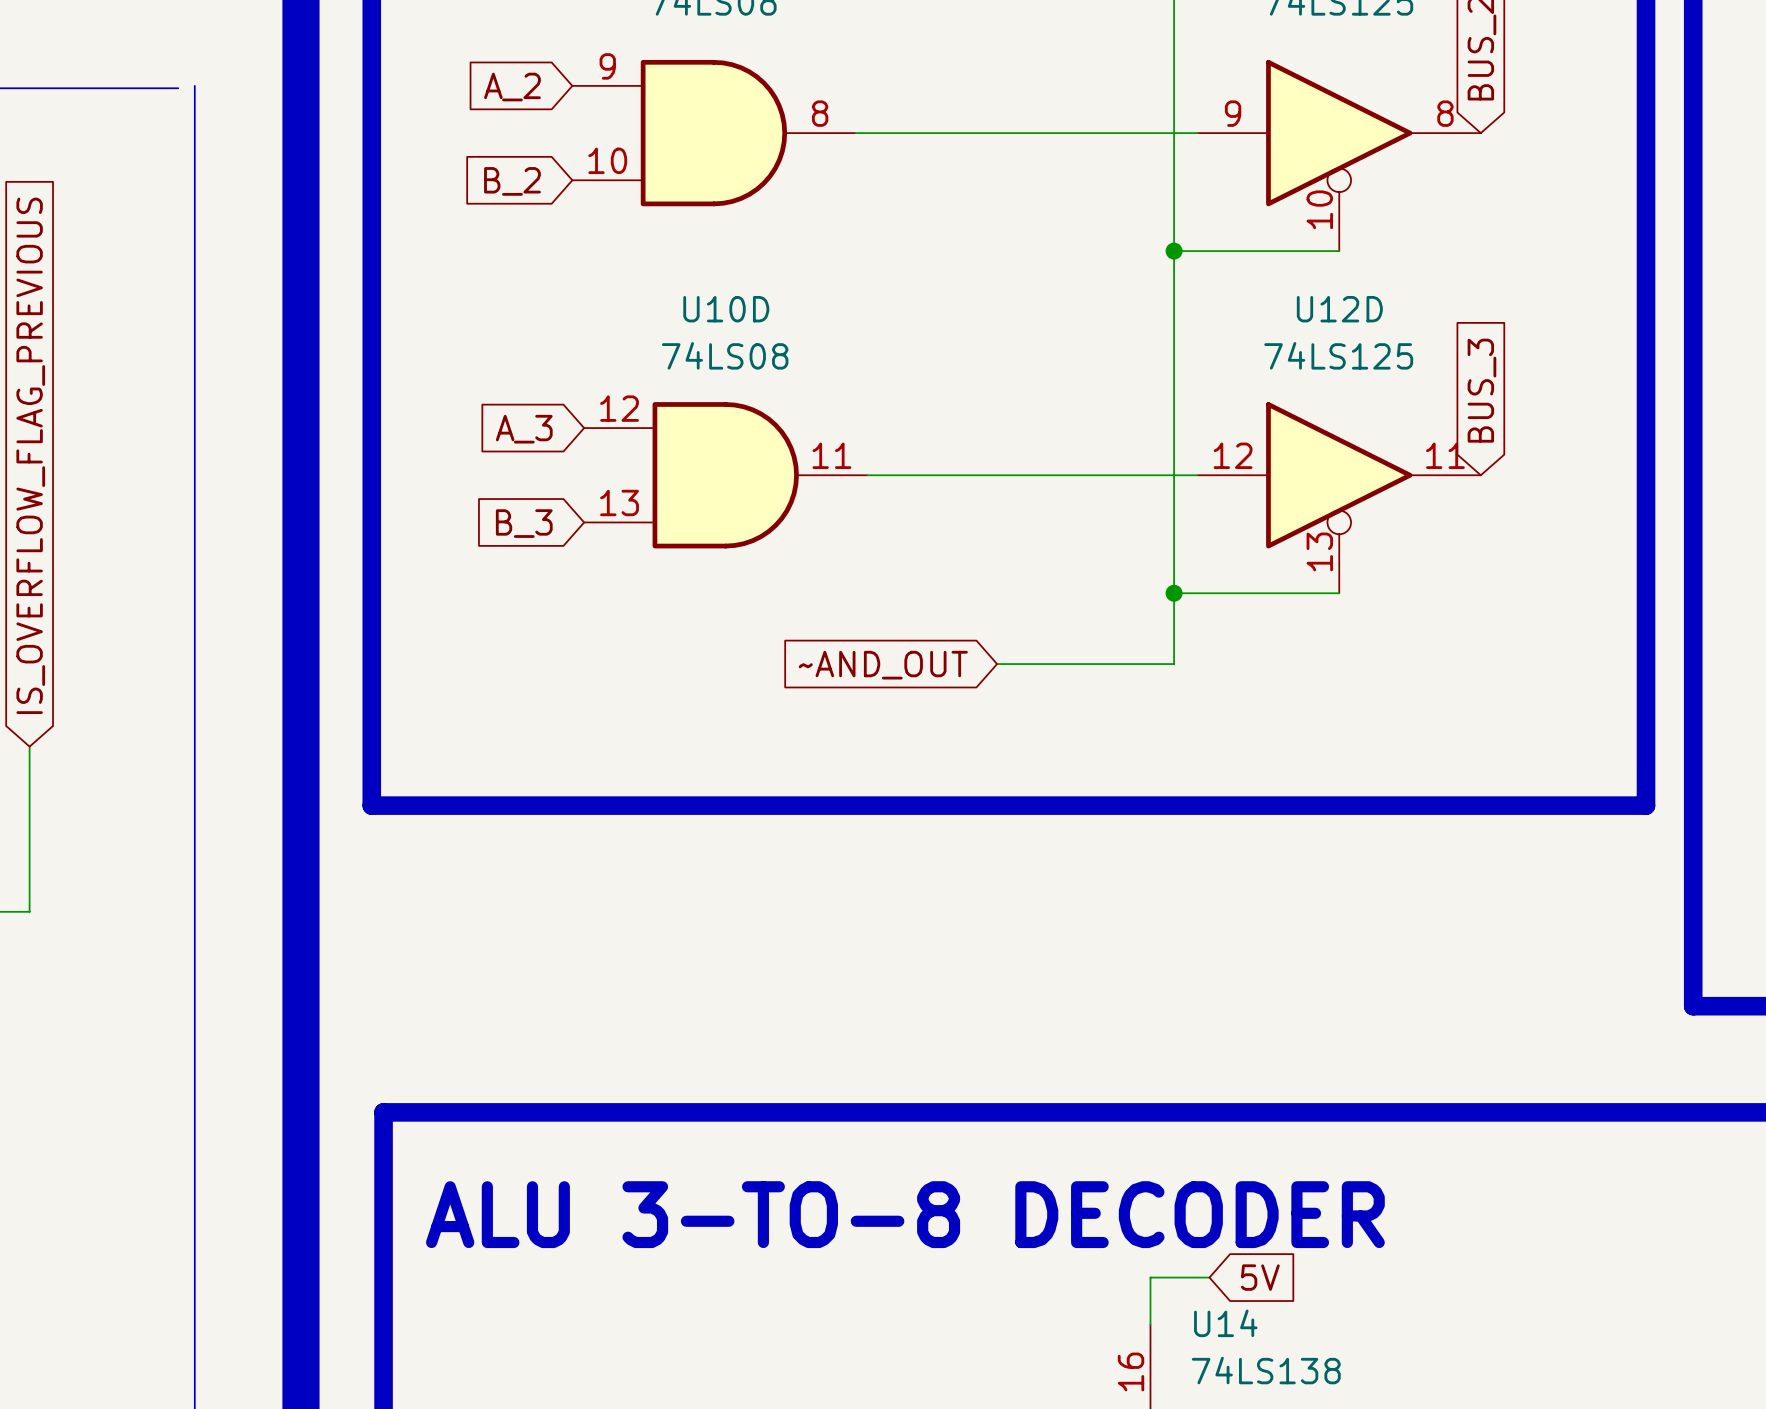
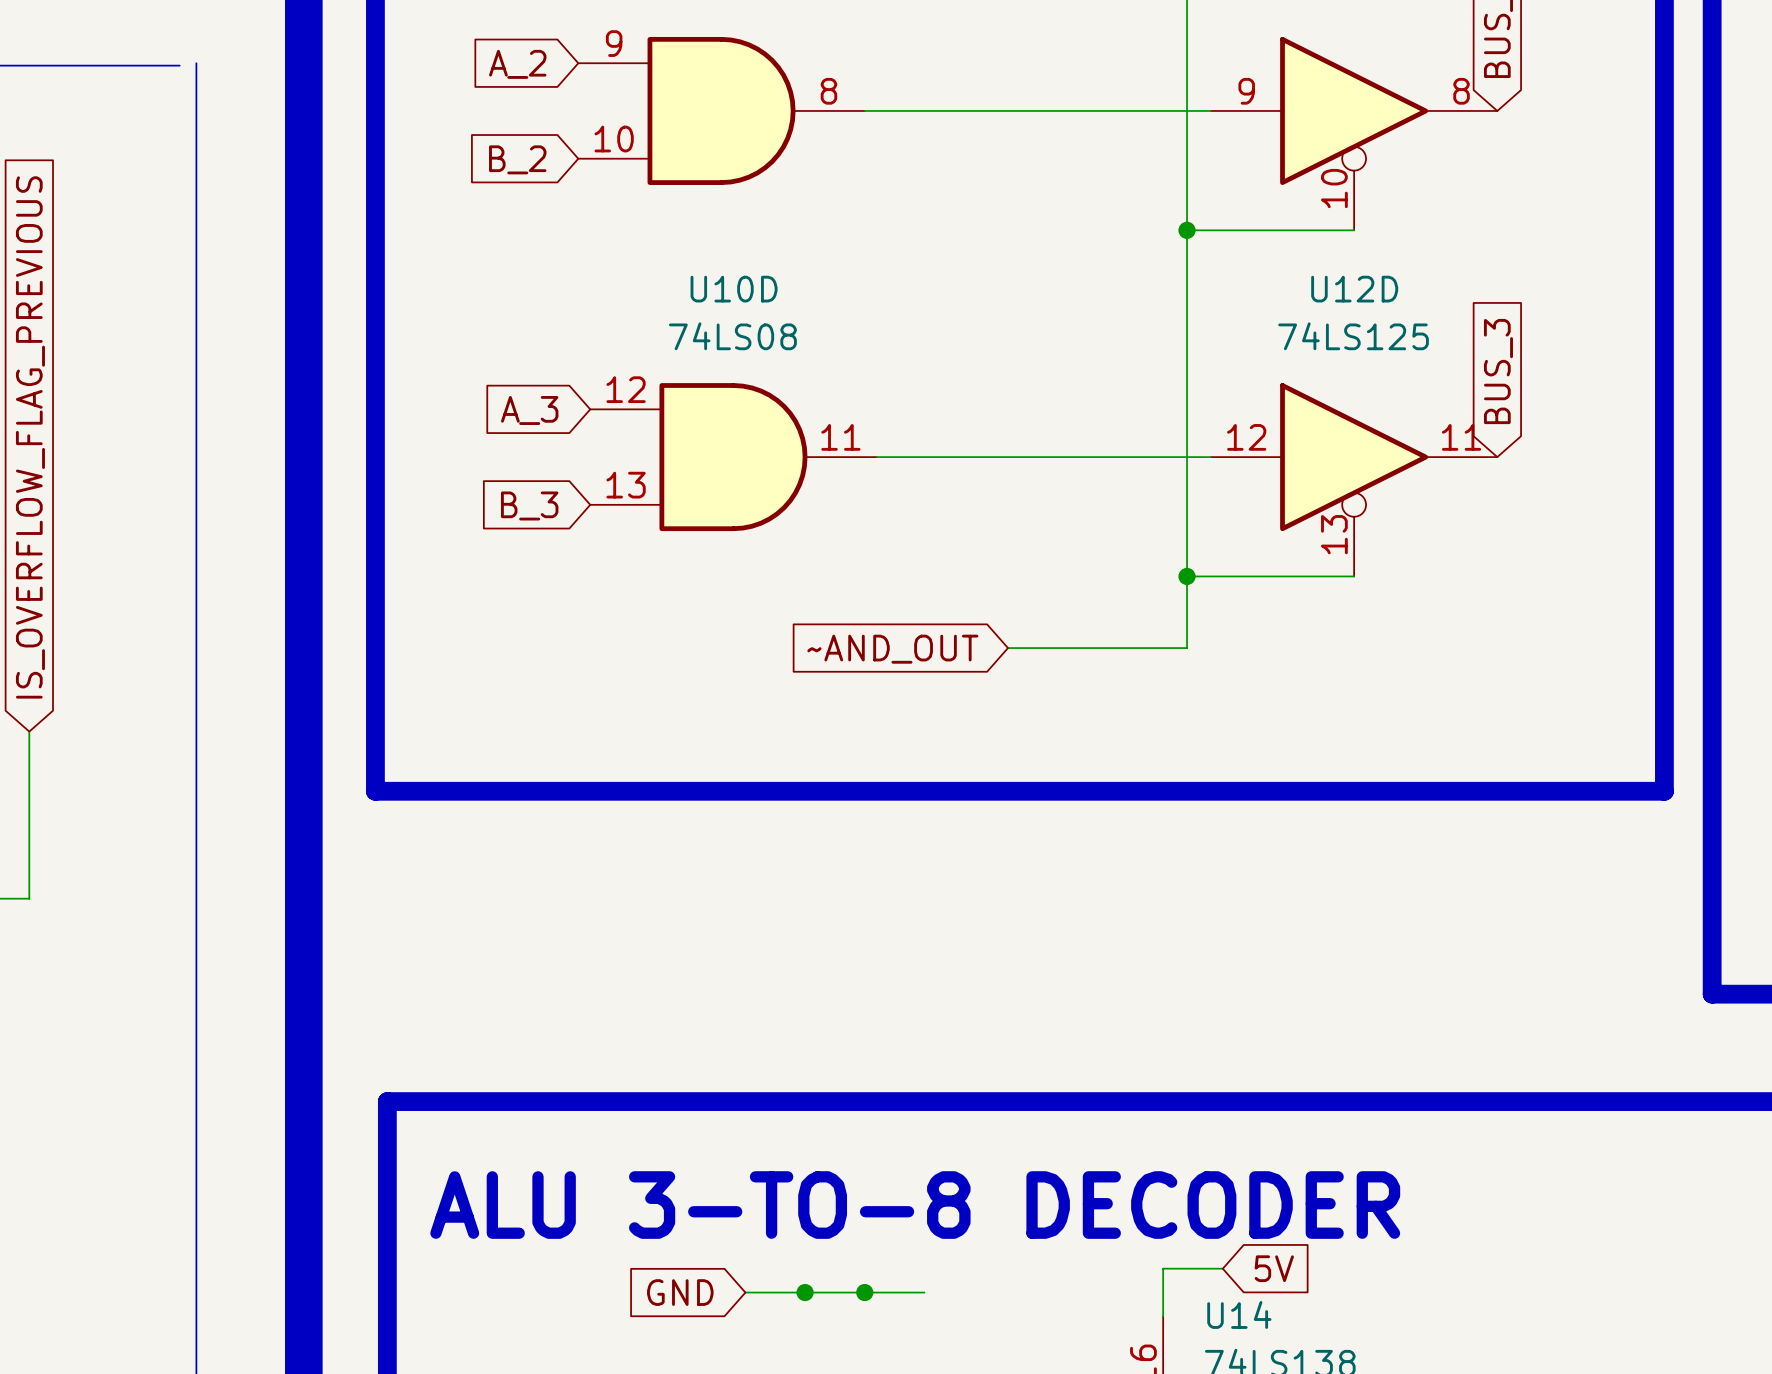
global label: none -> GND (680, 1292)
wire: none -> (745, 1292) (924, 1292)
junction: none -> (805, 1292)
junction: none -> (864, 1292)

